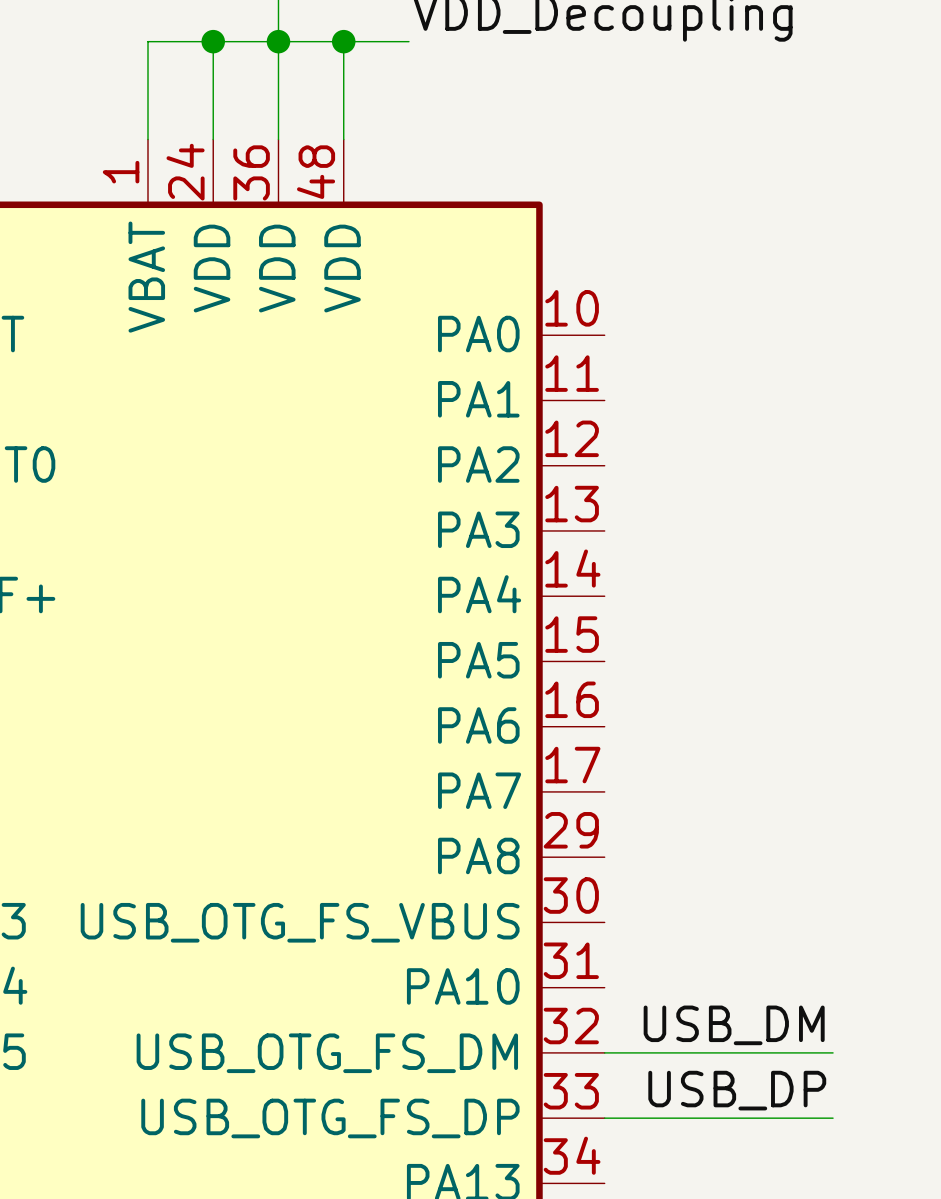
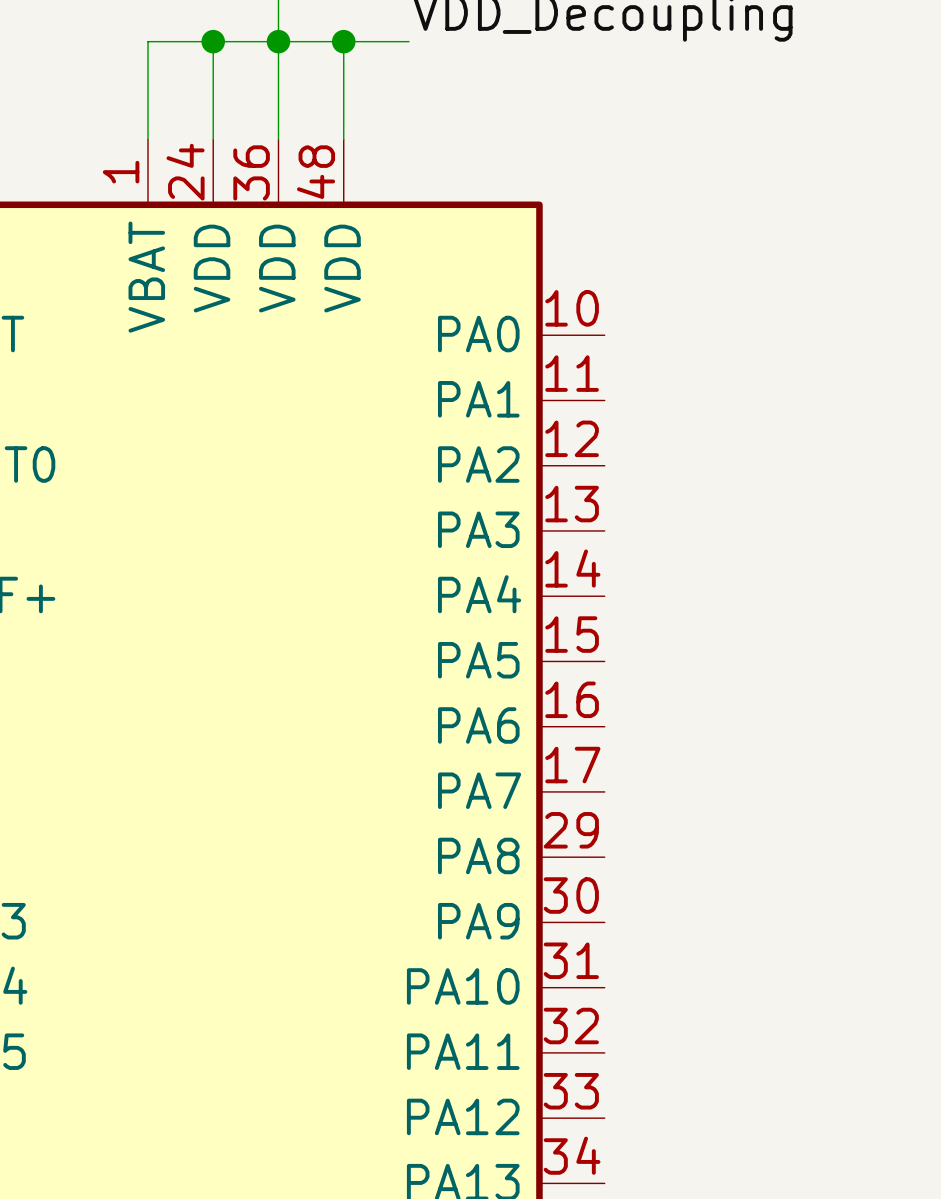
part pin name: USB_OTG_FS_VBUS (300, 922) -> PA9 (478, 921)
label: USB_DM (734, 1025) -> none
wire: (604, 1052) (833, 1052) -> none
part pin name: USB_OTG_FS_DM (327, 1053) -> PA11 (463, 1051)
label: USB_DP (737, 1090) -> none
part pin name: USB_OTG_FS_DP (330, 1118) -> PA12 (463, 1116)
wire: (604, 1118) (833, 1118) -> none

